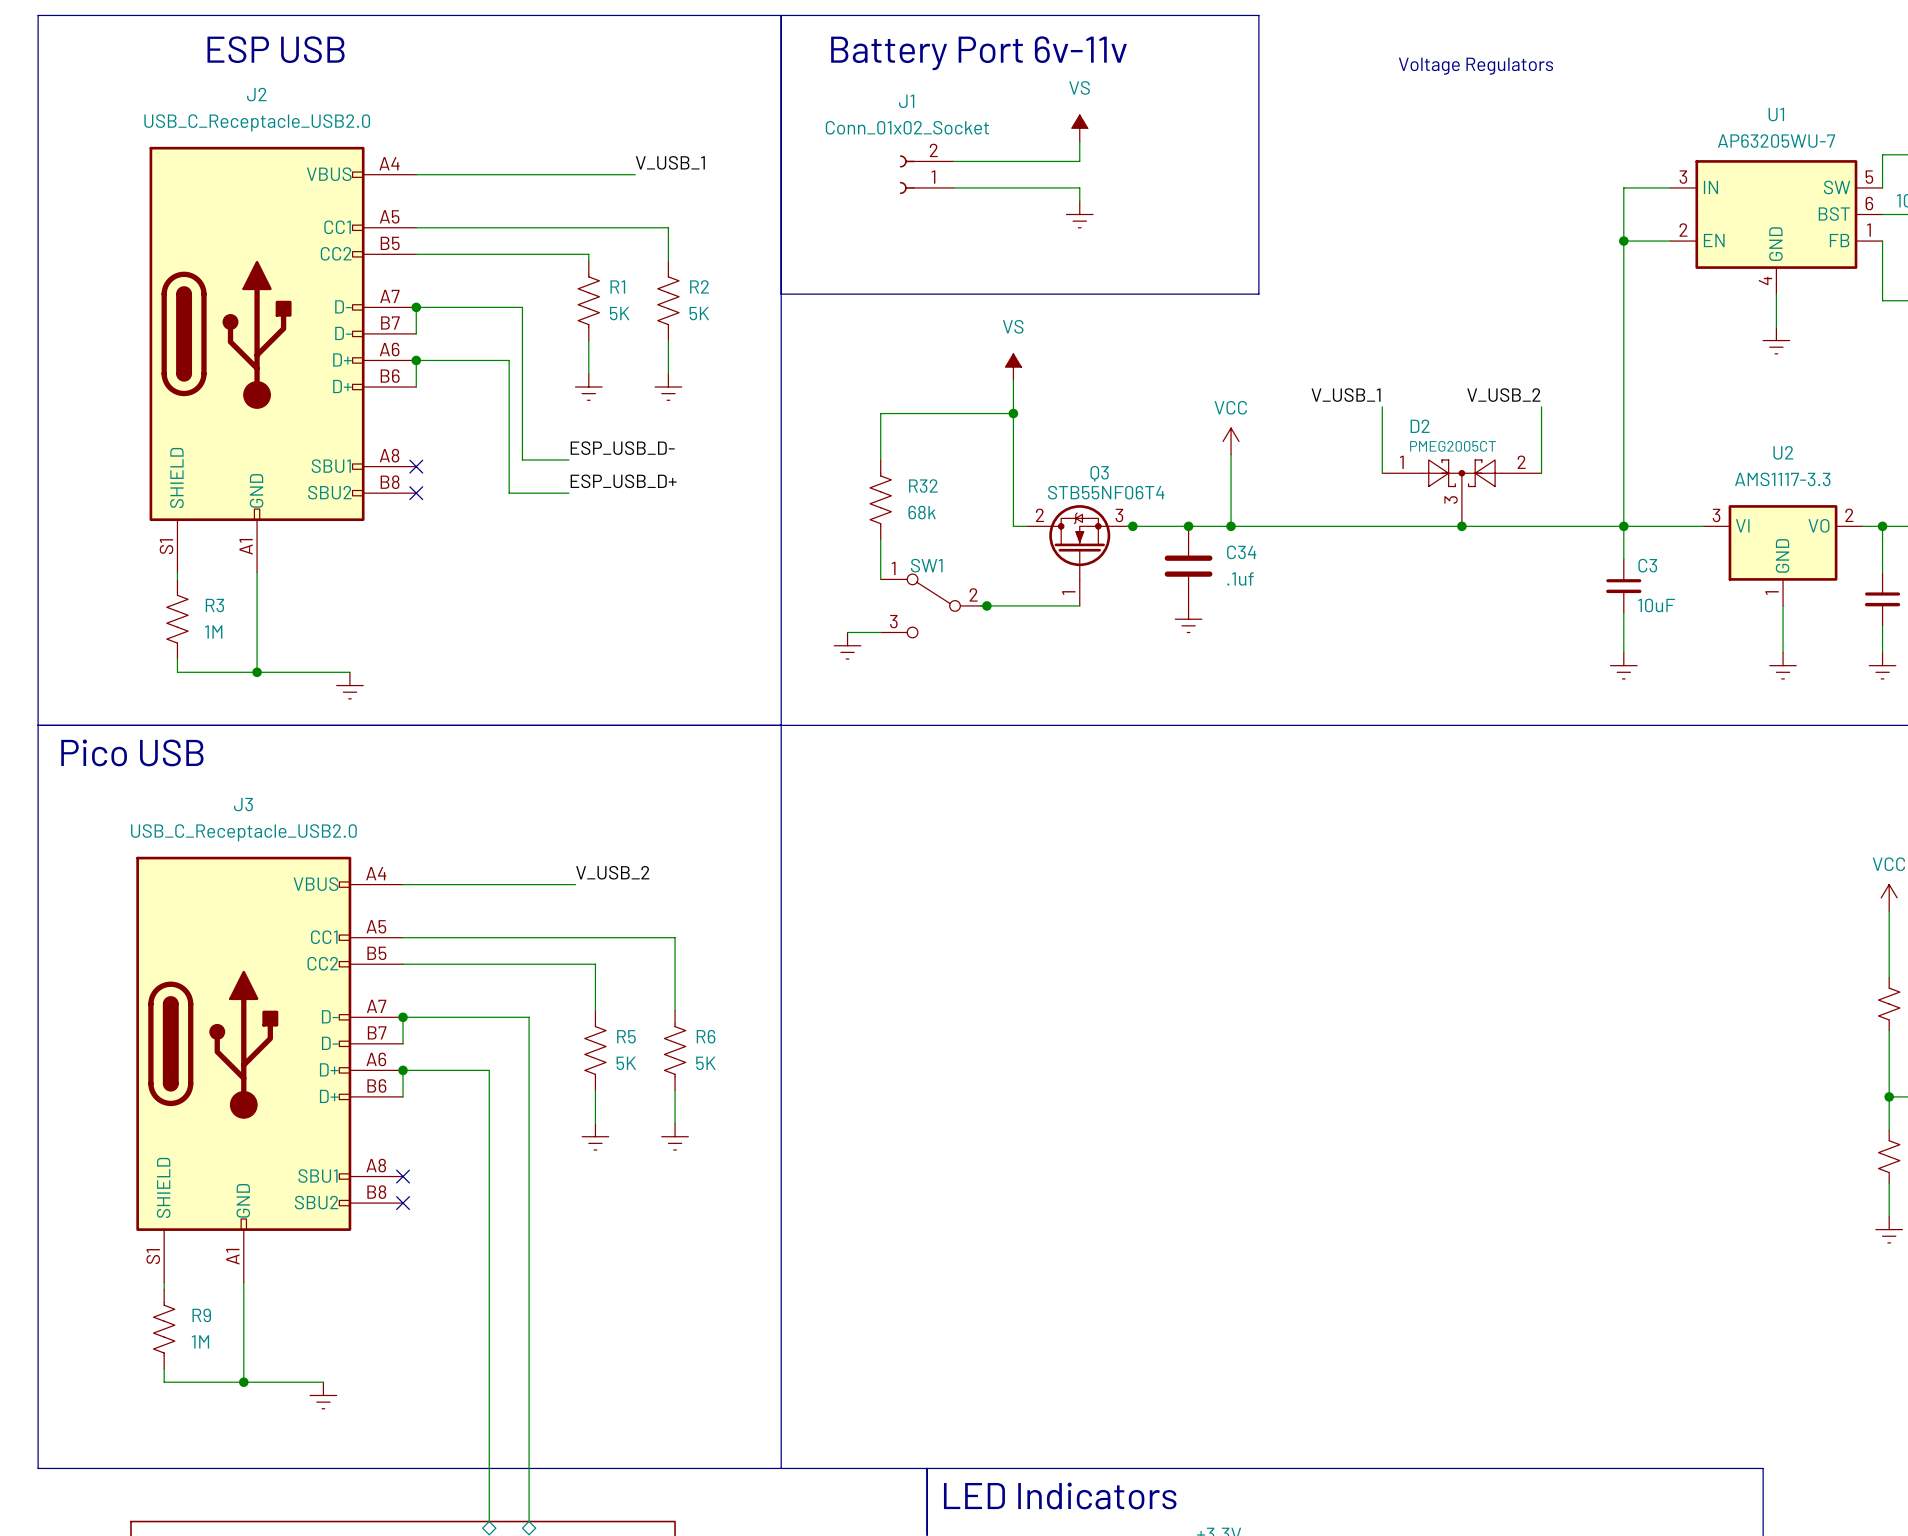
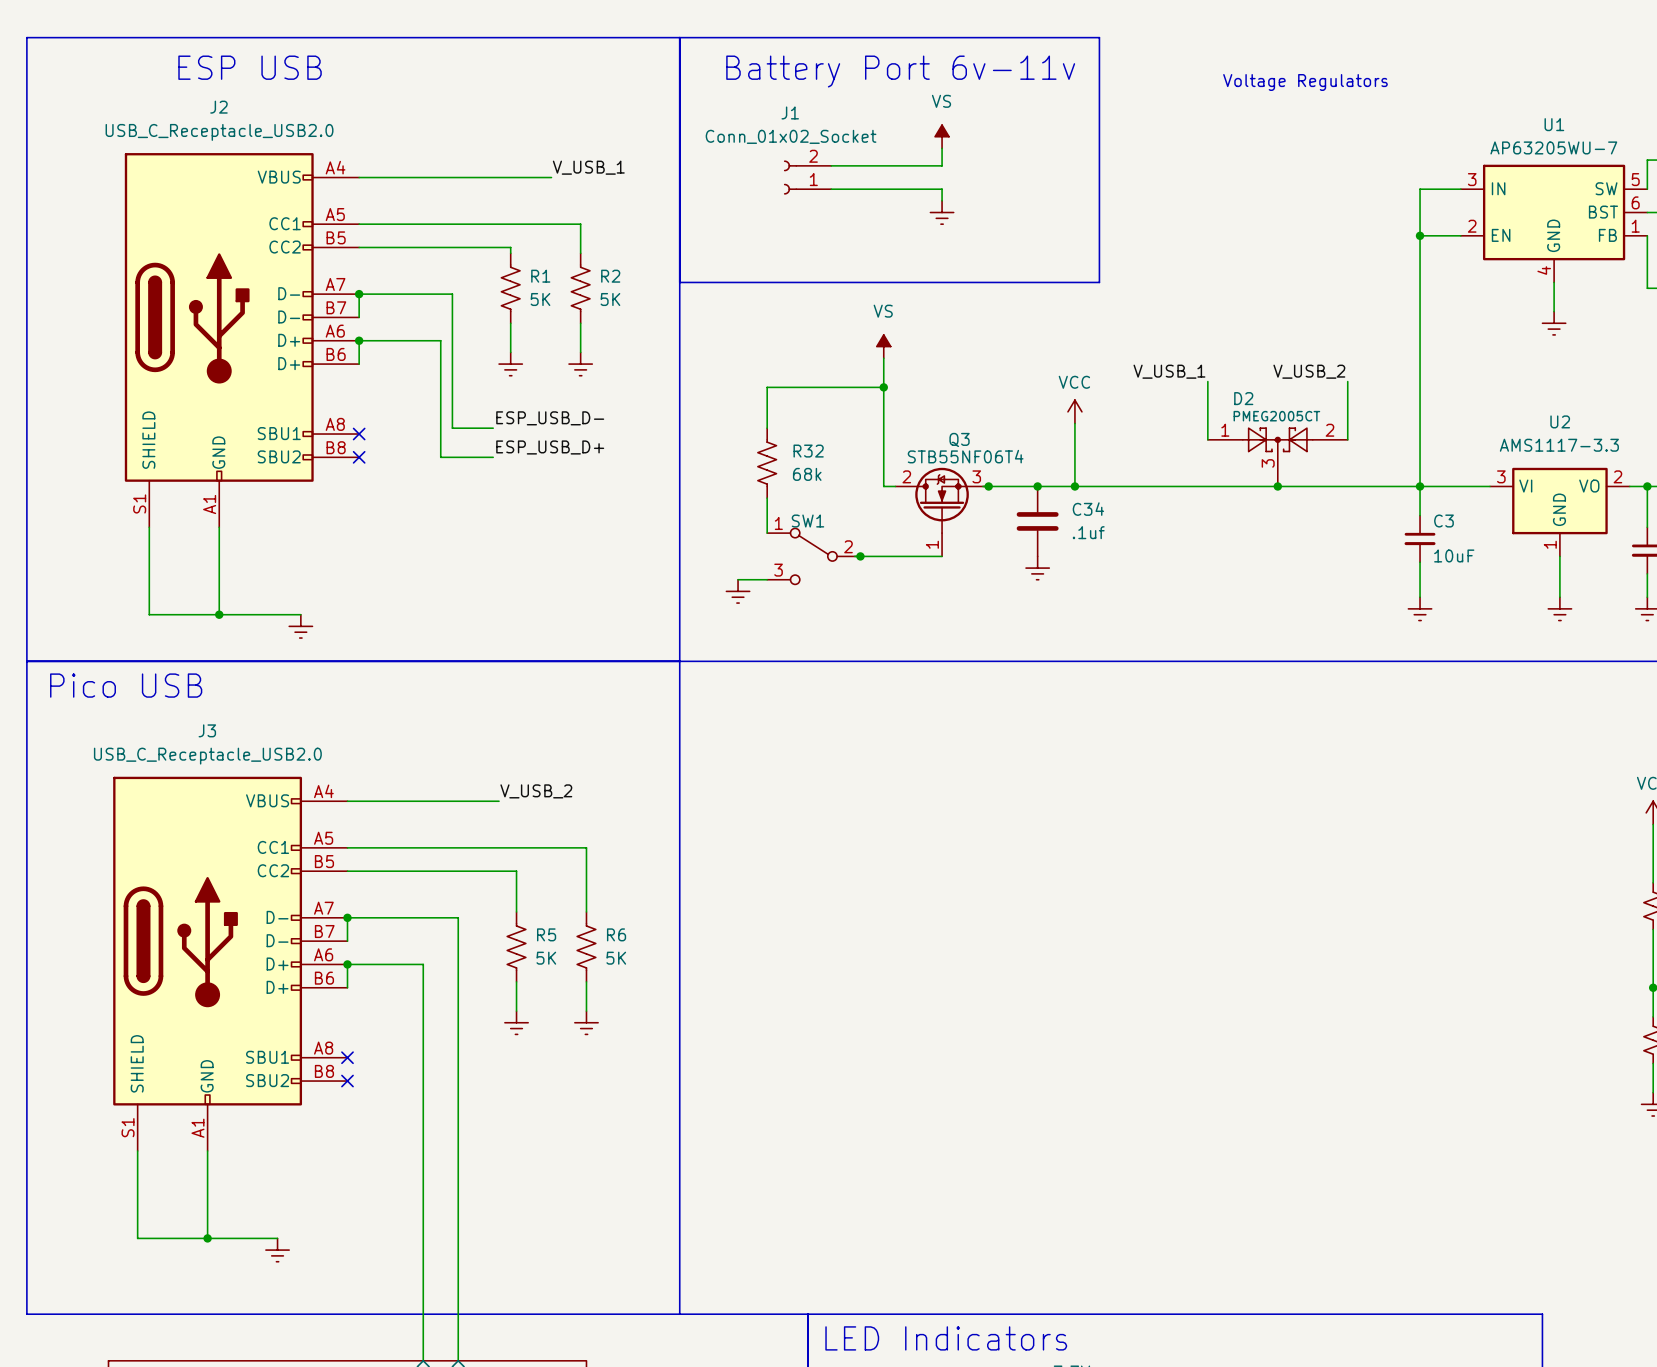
R3: 1M (177, 619) -> none
R9: 1M (164, 1329) -> none

